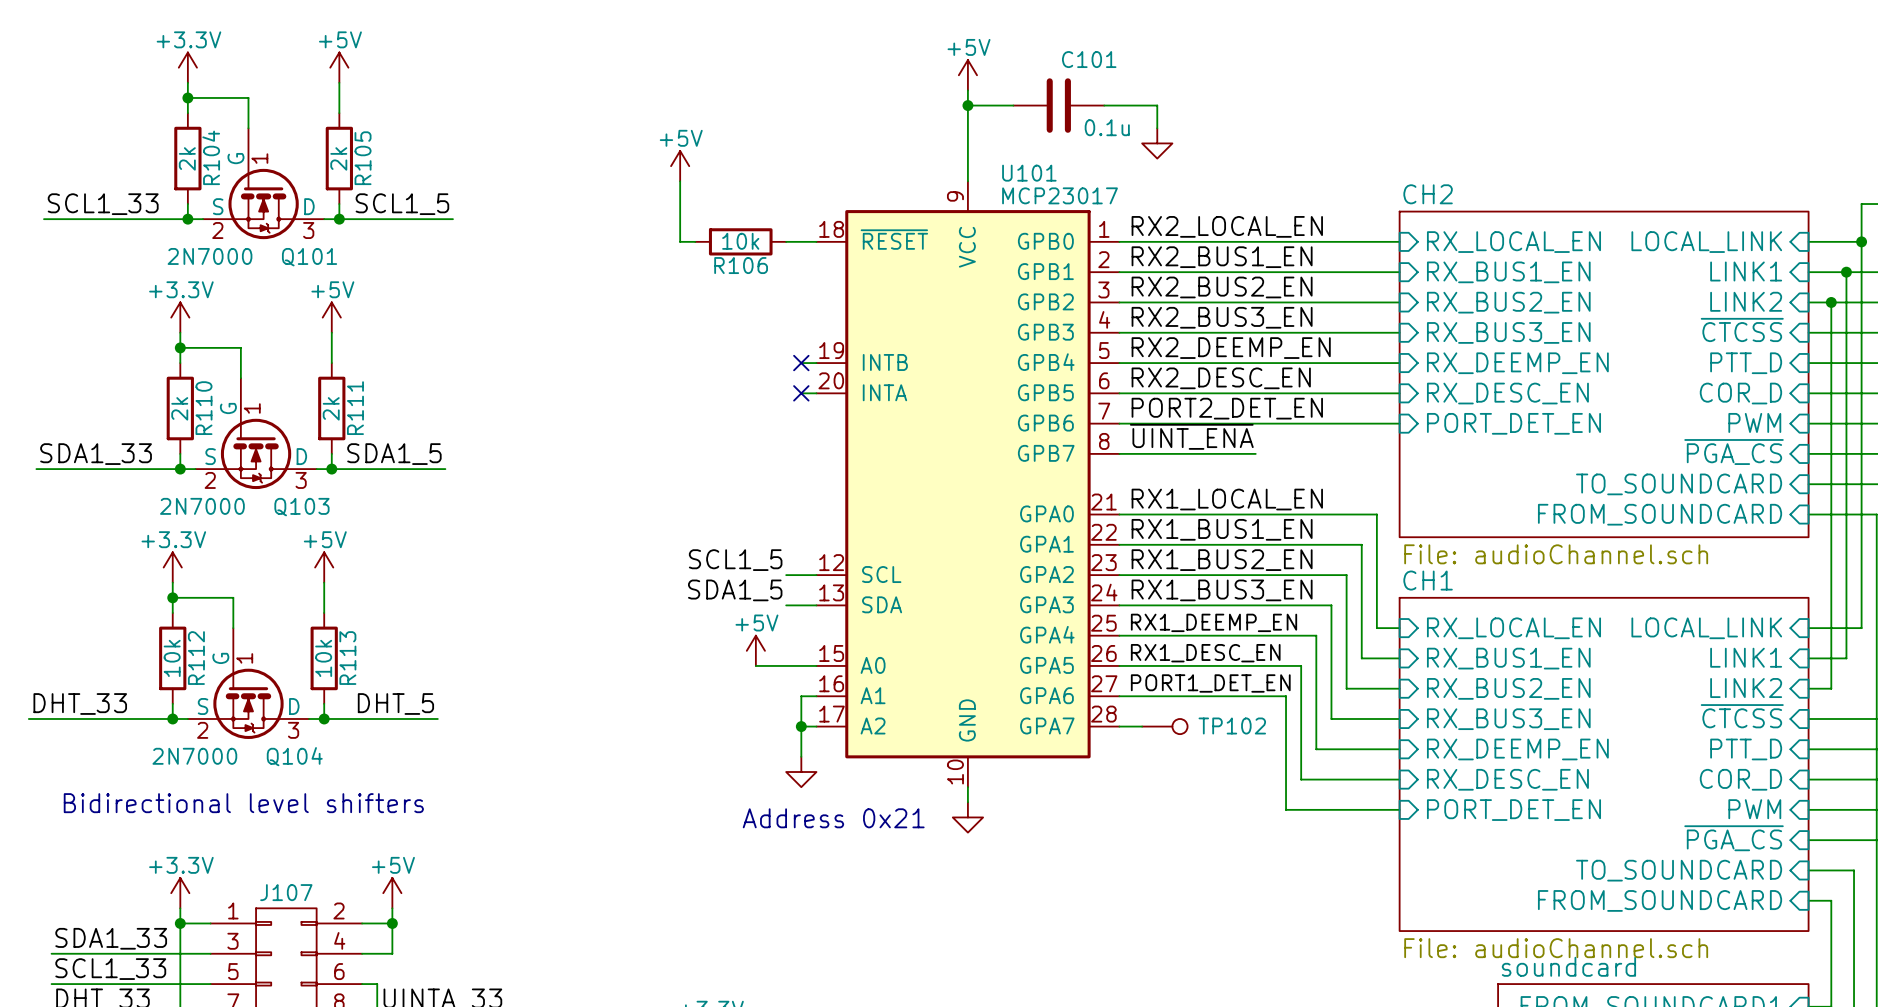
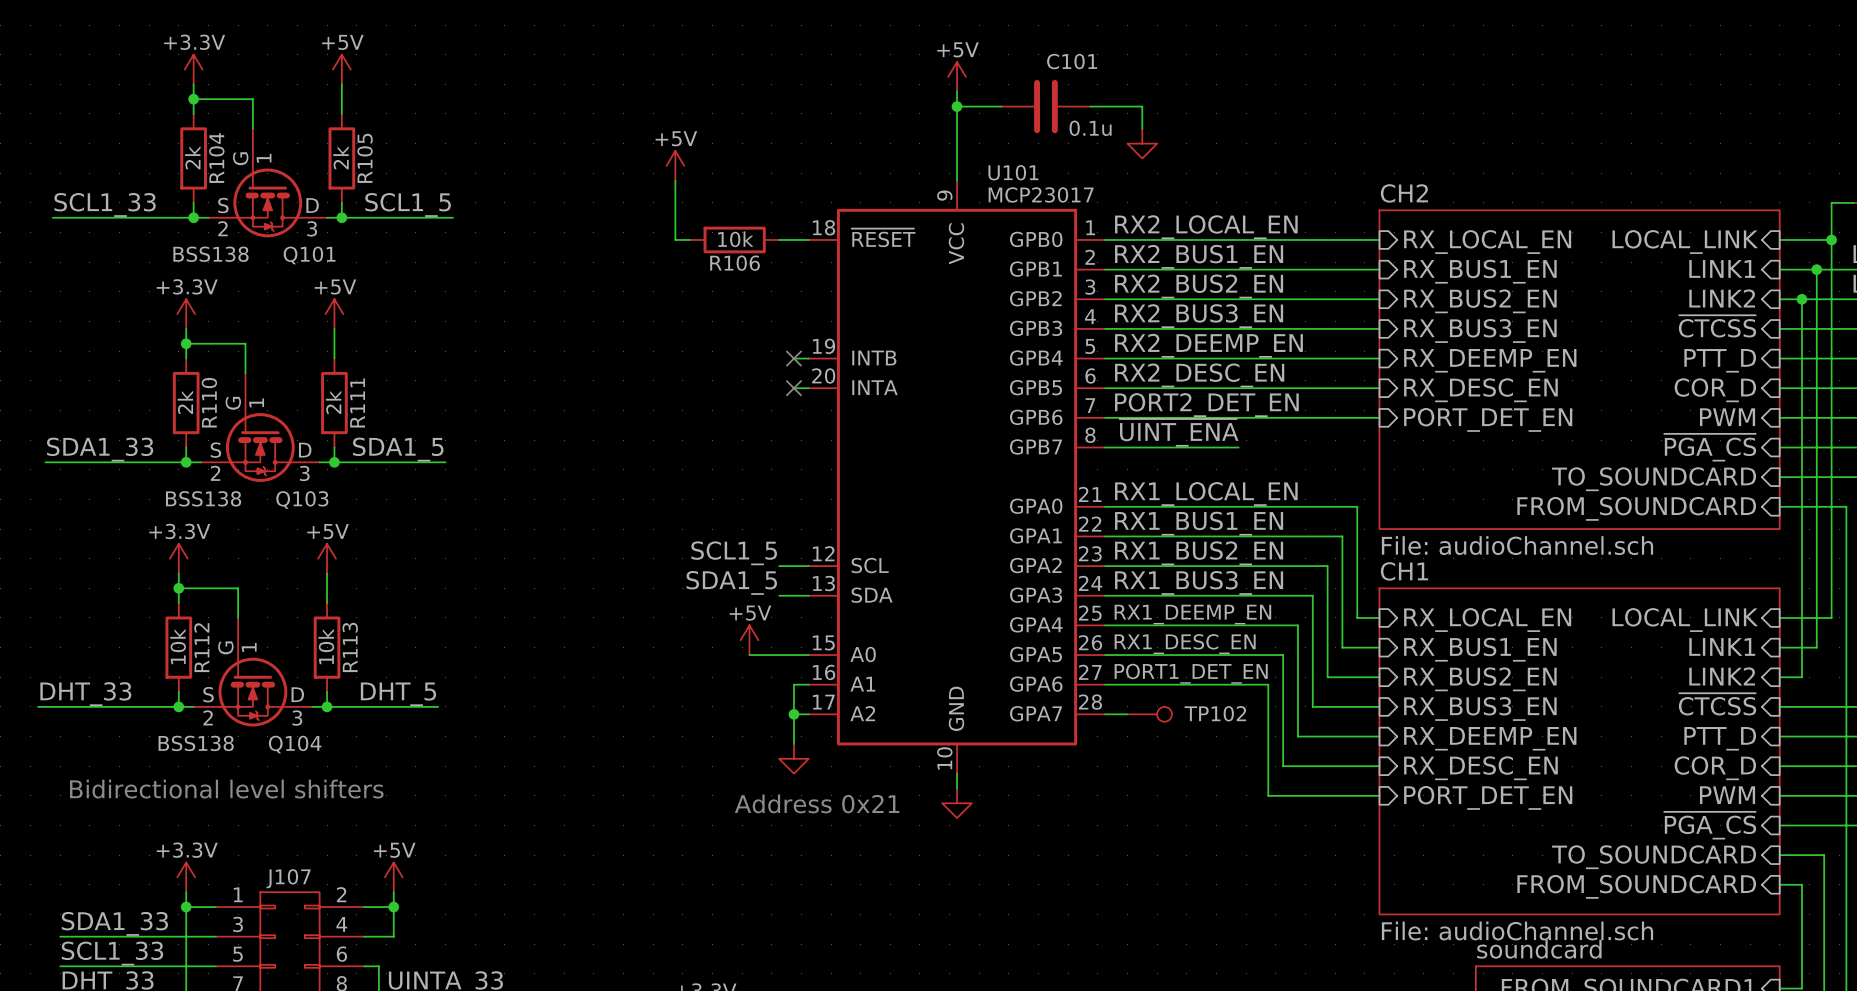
Q101 value: 2N7000 (210, 256) -> BSS138 (210, 254)
Q103 value: 2N7000 (202, 506) -> BSS138 (203, 498)
Q104 value: 2N7000 (194, 756) -> BSS138 (196, 743)

